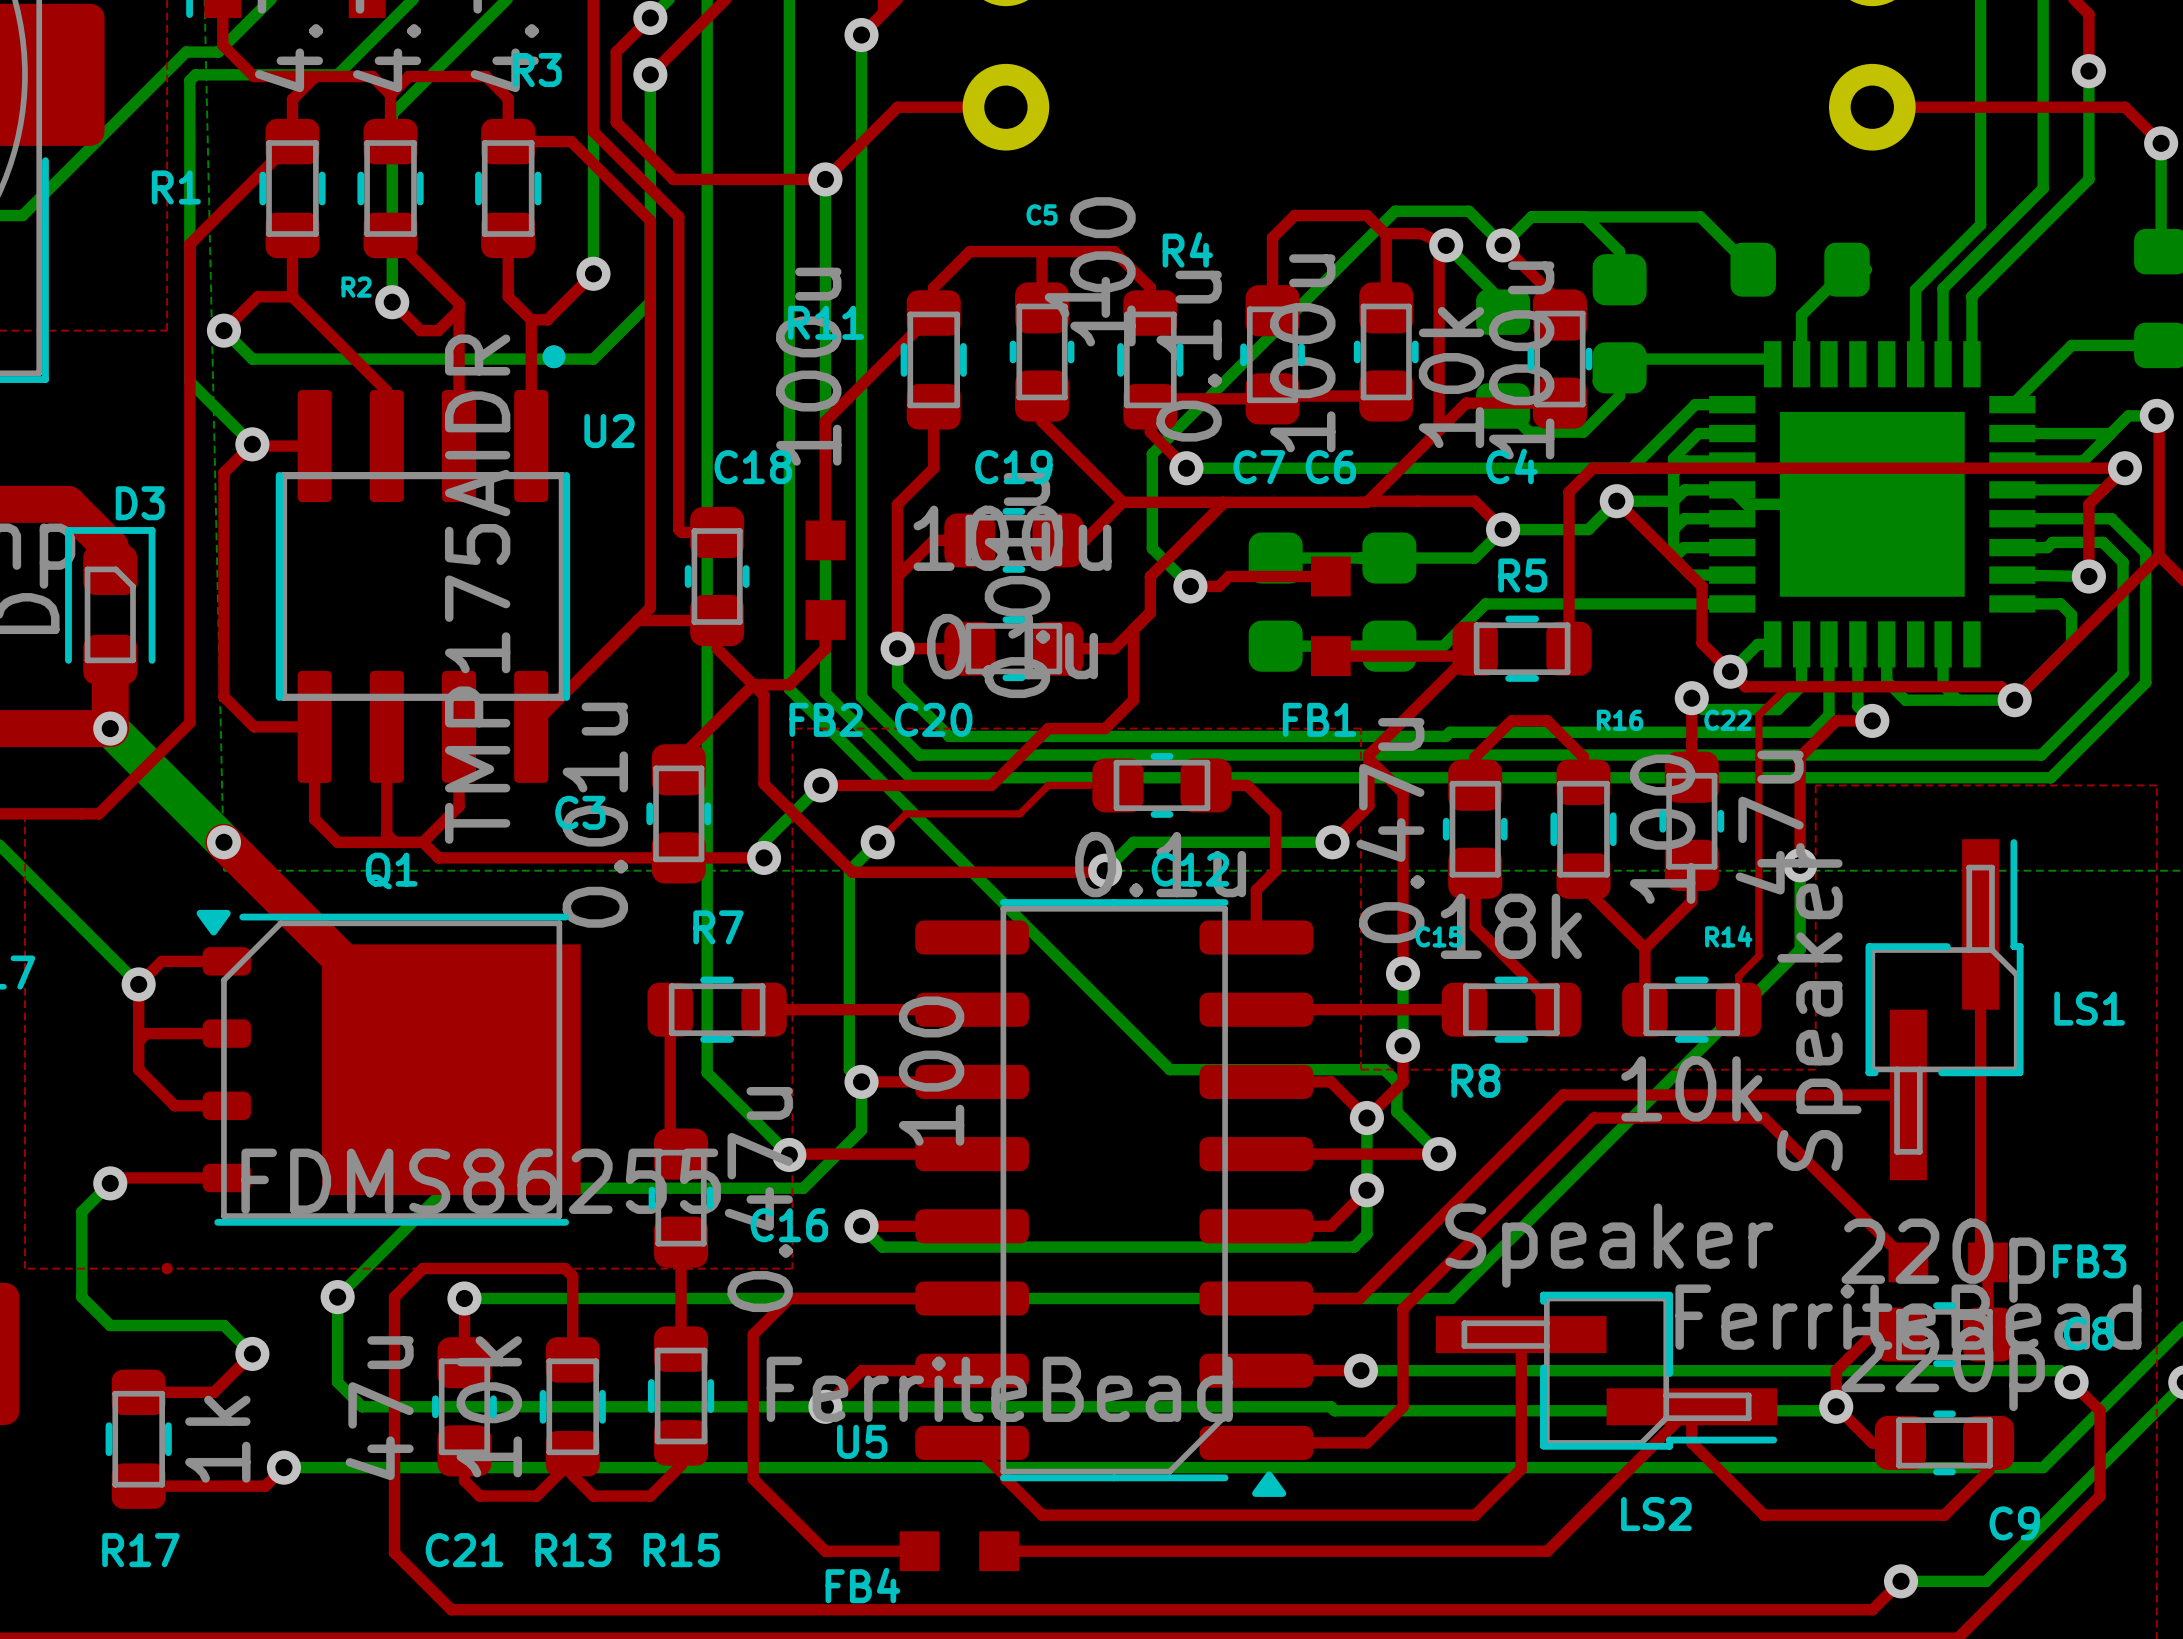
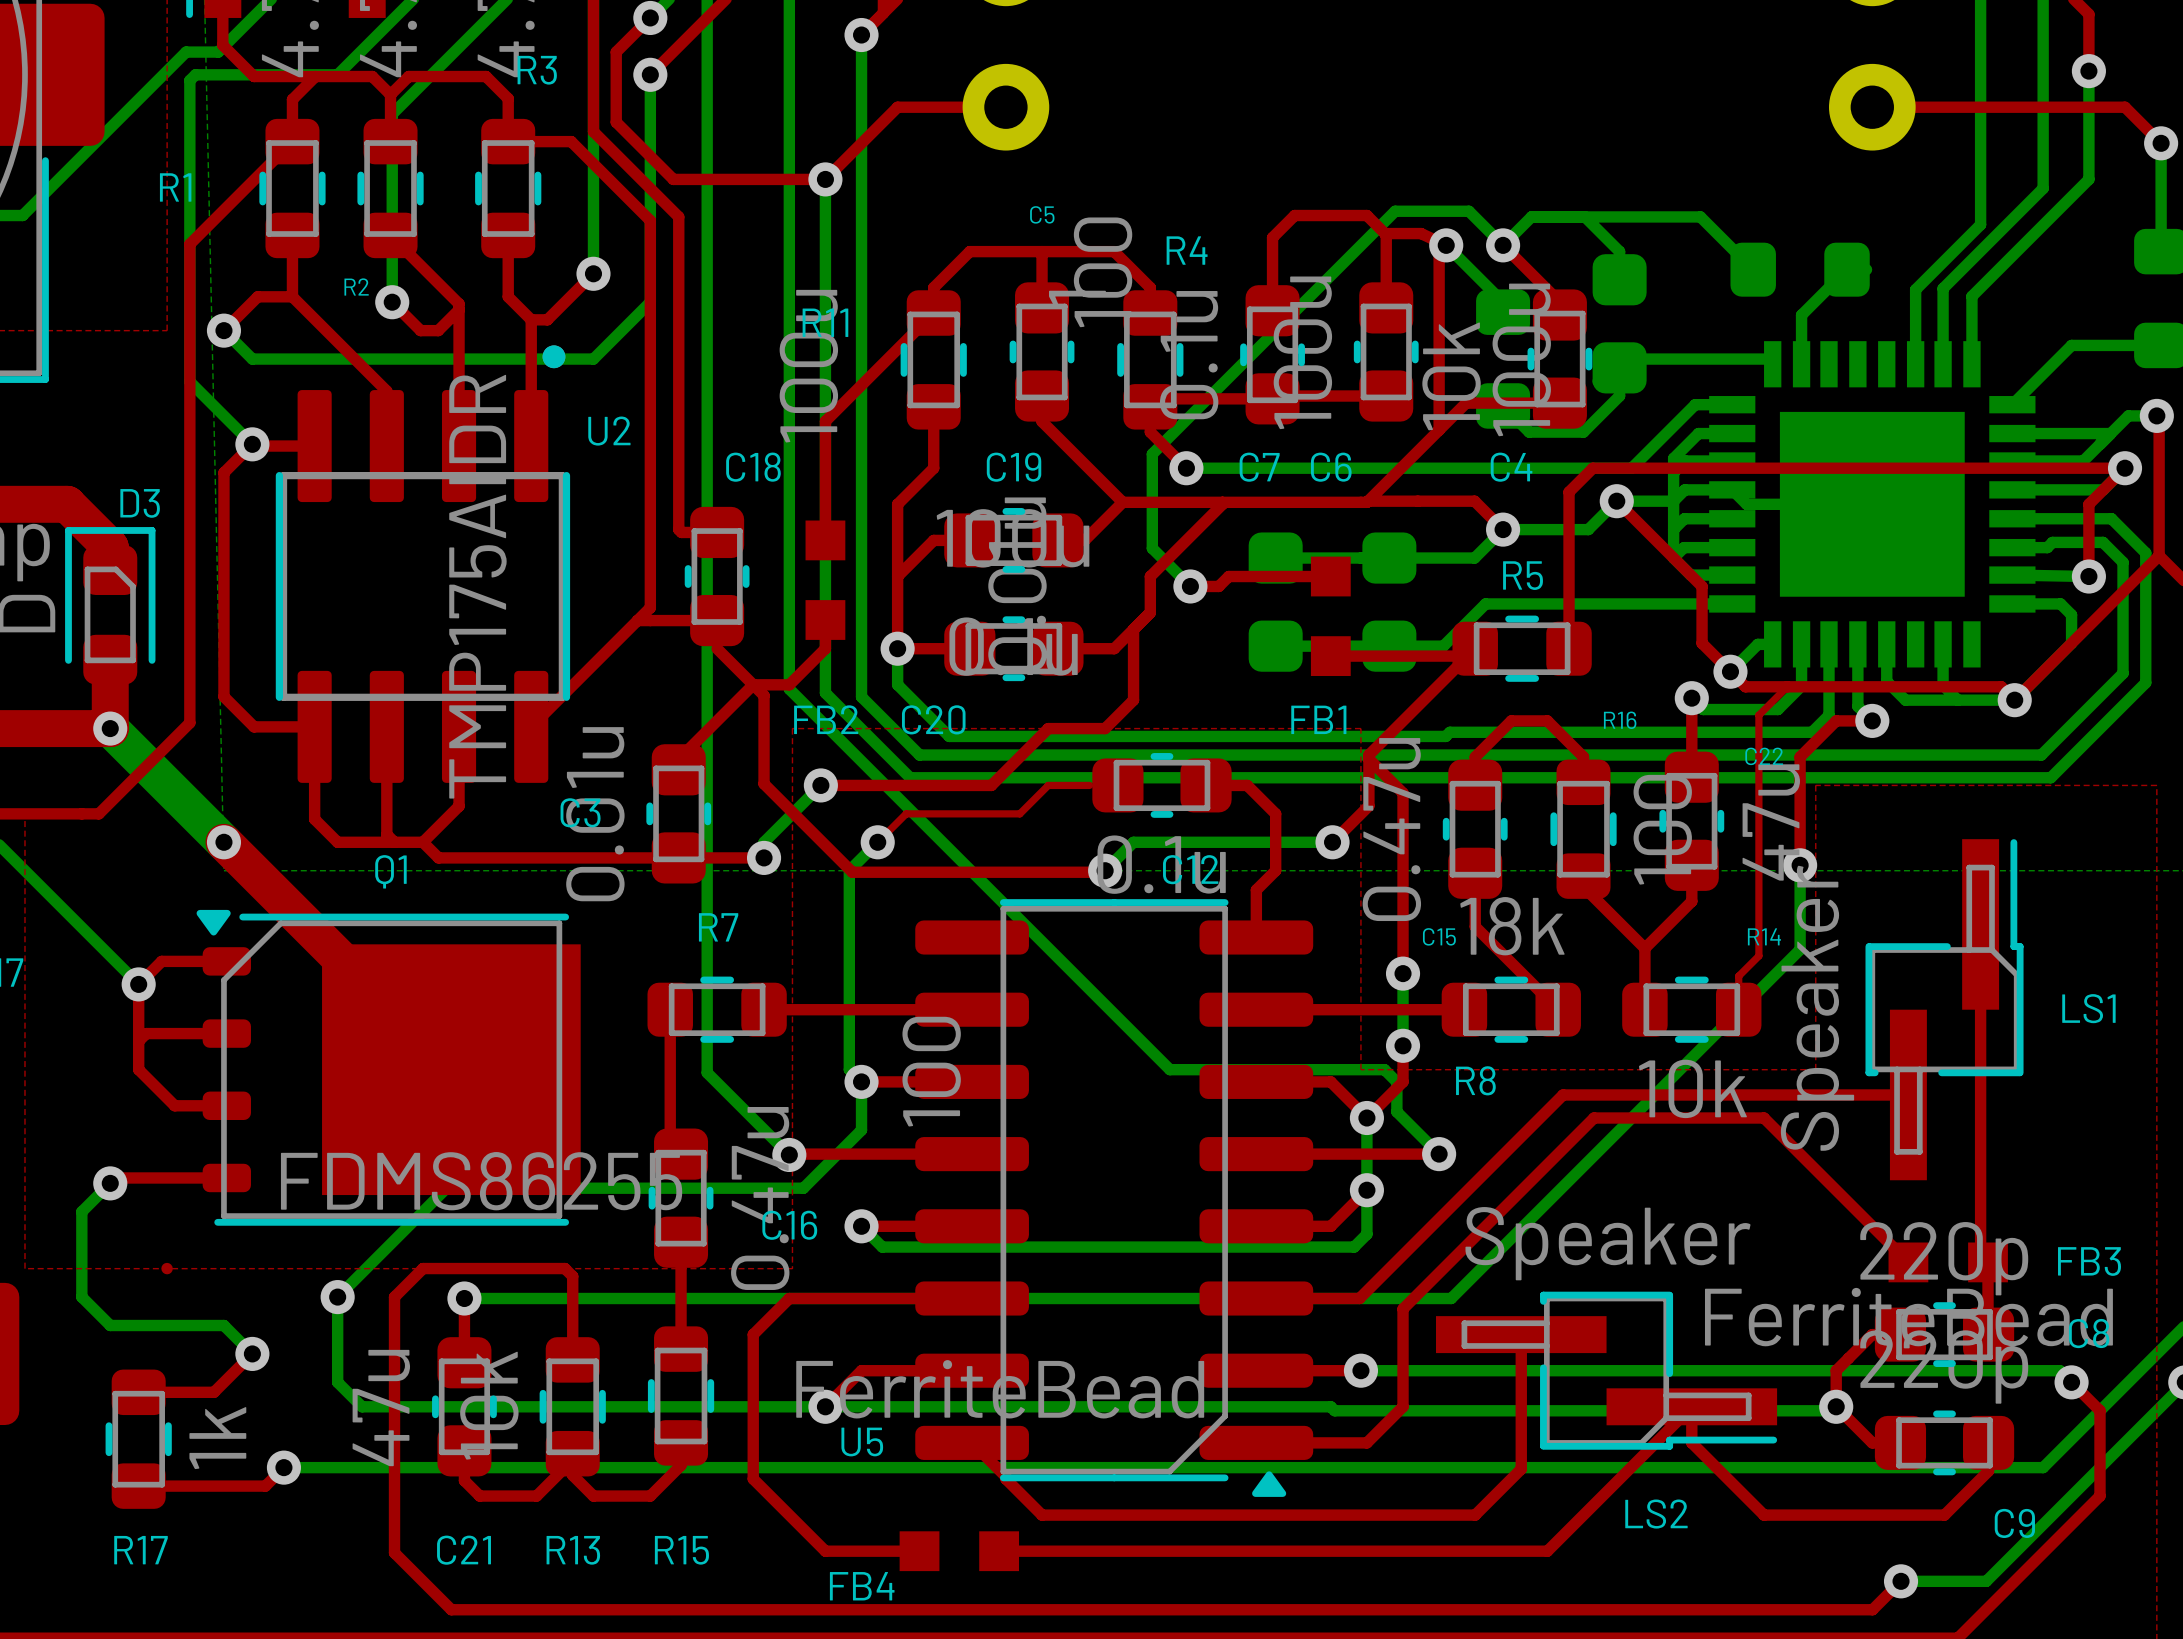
C22 name position: C22 (1727, 720) -> C22 (1764, 756)
R14 name position: R14 (1728, 936) -> R14 (1764, 936)

